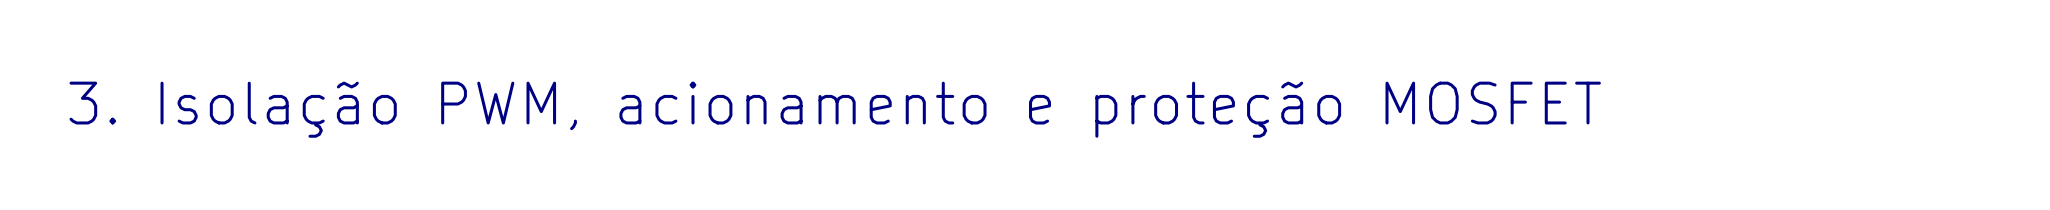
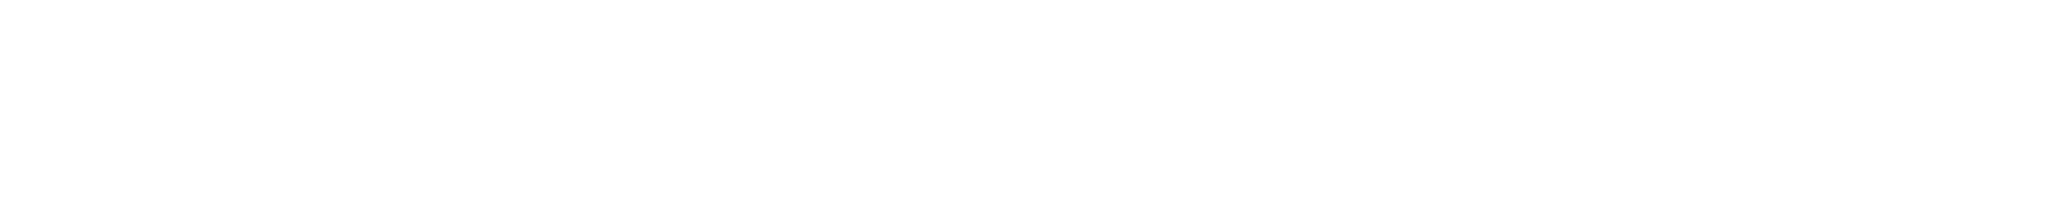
text: 3. Isolação PWM, acionamento e proteção MOSFET (835, 109) -> none

